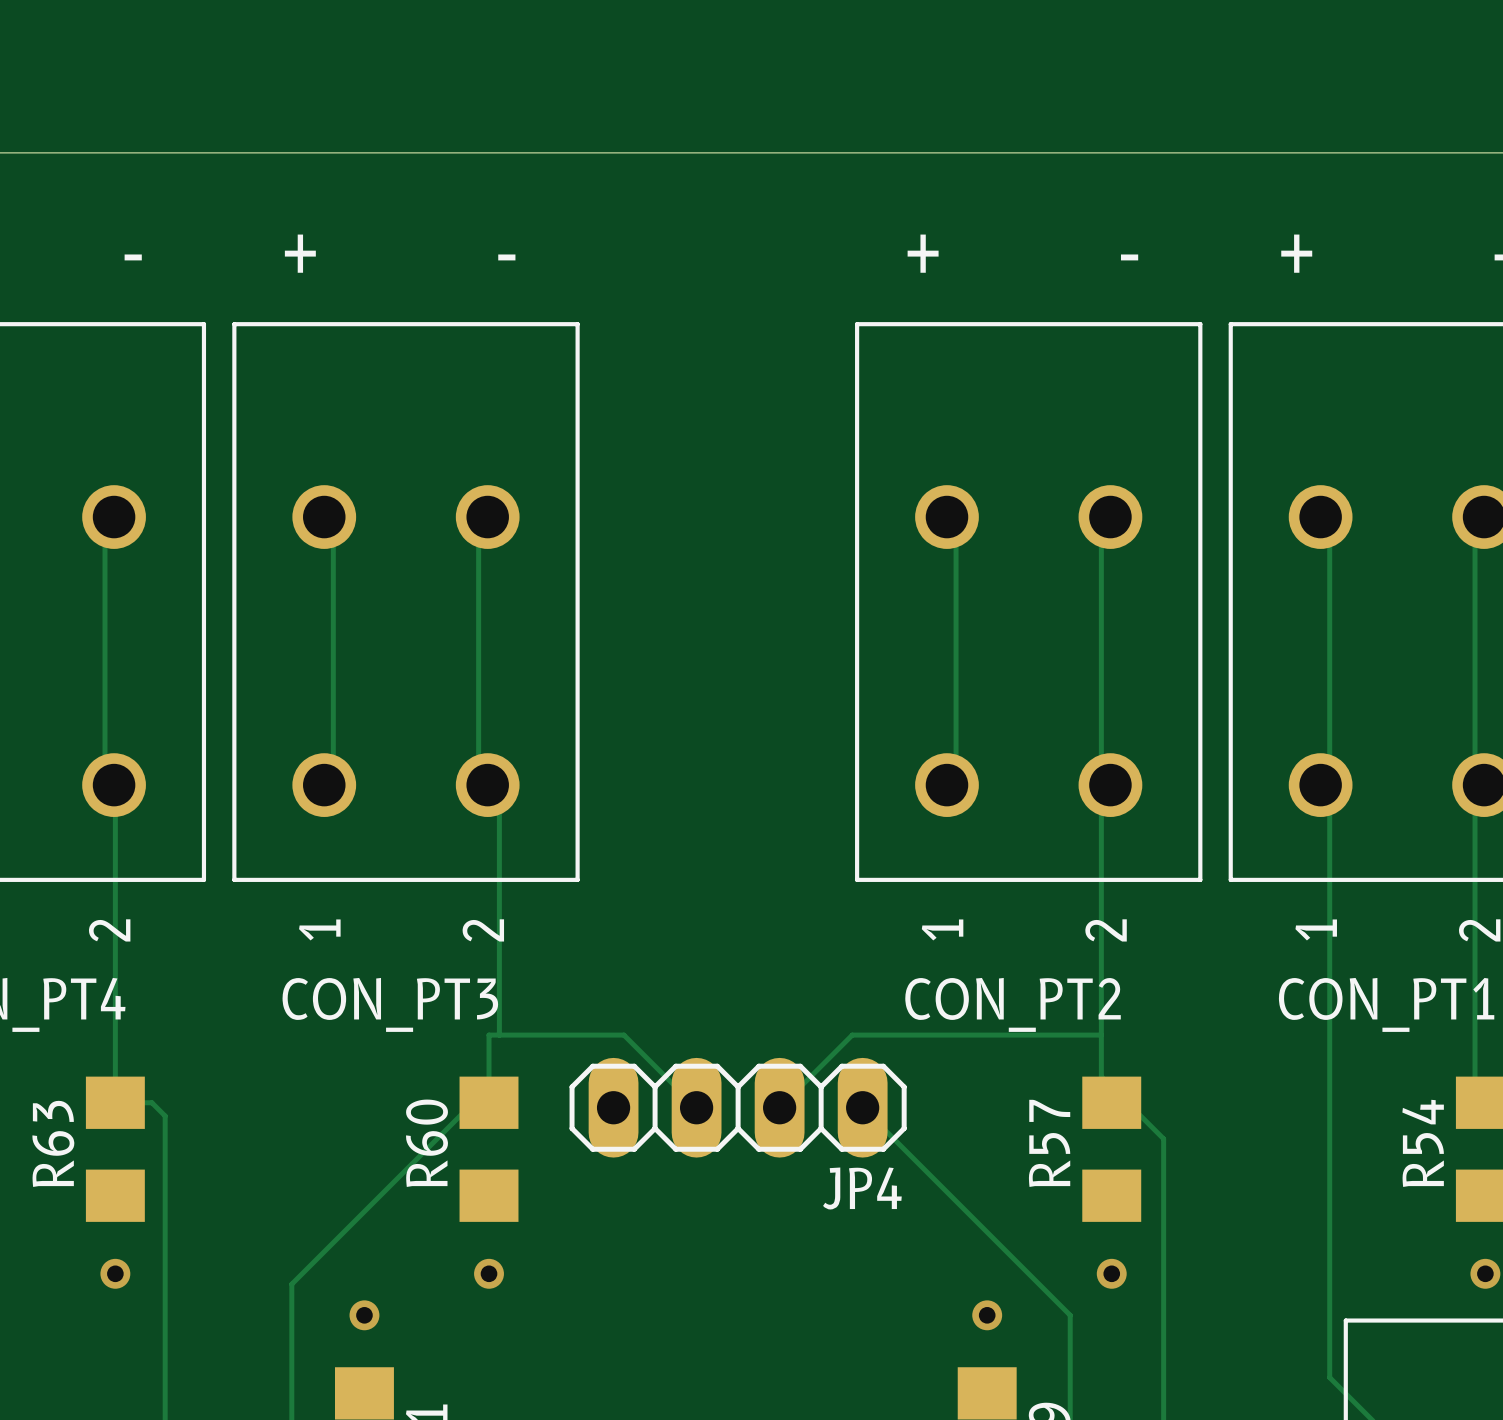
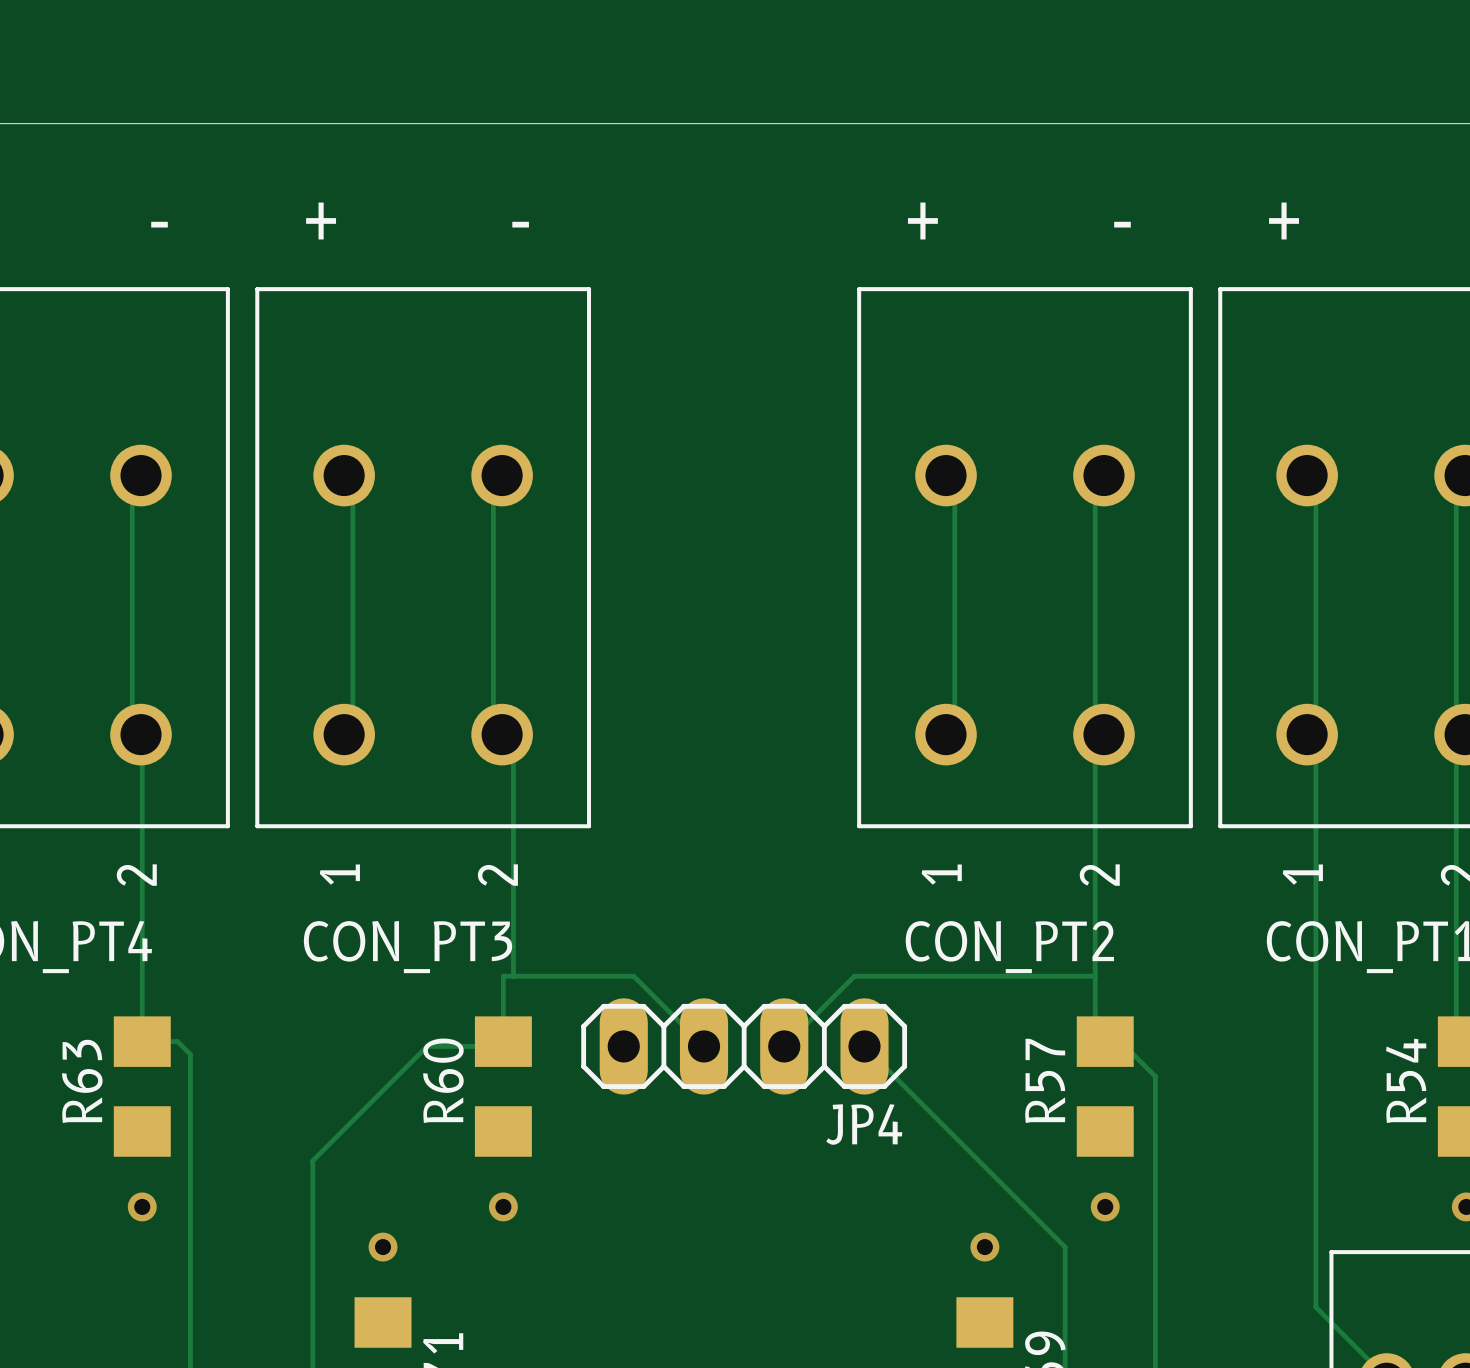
track: (468, 1107) (291, 1284) -> (483, 1046) (427, 1046) (312, 1160) (312, 1216)

